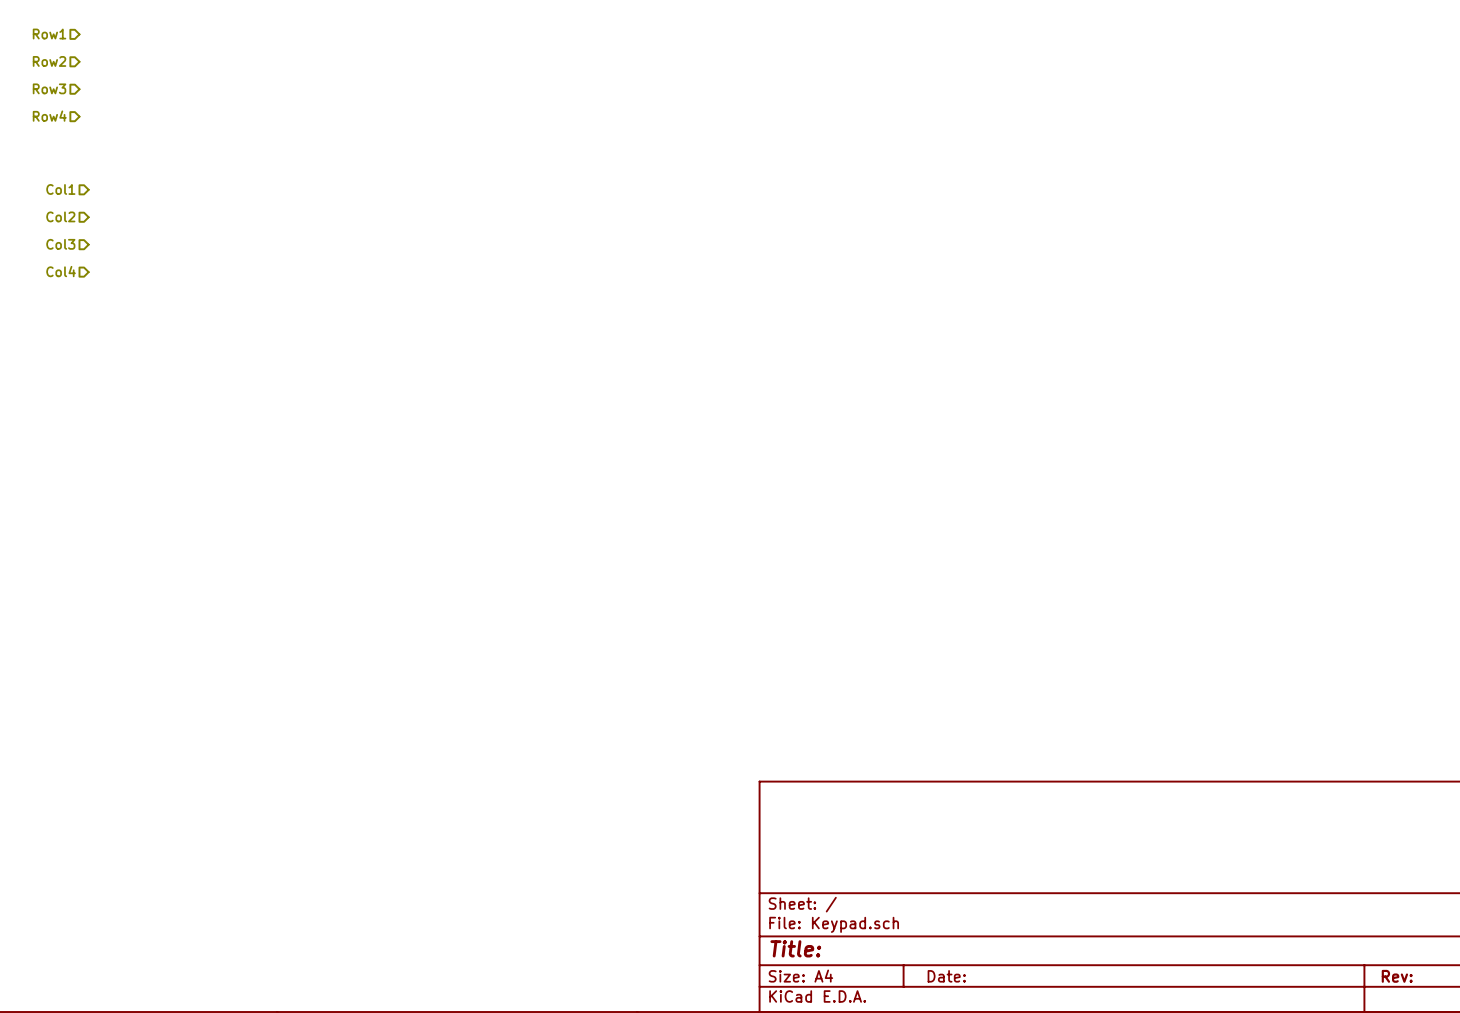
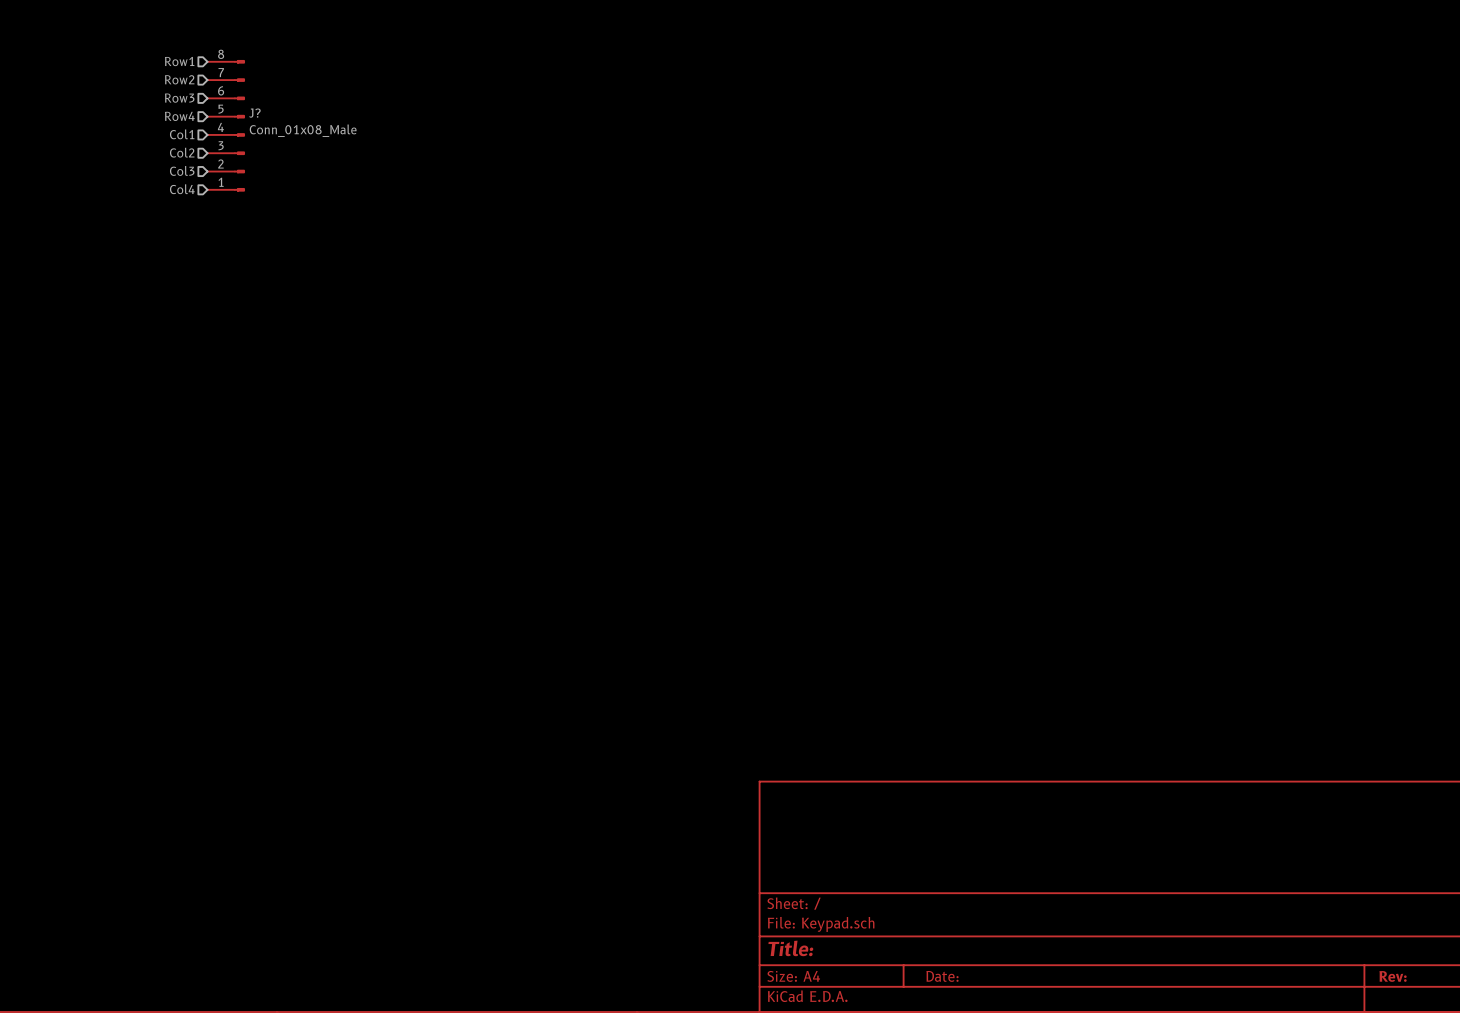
hierarchical label position: Row1 (49, 34) -> Row1 (179, 61)
hierarchical label position: Row2 (49, 61) -> Row2 (179, 79)
hierarchical label position: Row3 (49, 88) -> Row3 (179, 98)
hierarchical label position: Row4 (49, 116) -> Row4 (179, 116)
J?: none -> Conn_01x08_Male (226, 125)
hierarchical label position: Col1 (60, 189) -> Col1 (182, 134)
hierarchical label position: Col2 (60, 216) -> Col2 (182, 152)
hierarchical label position: Col3 (60, 244) -> Col3 (182, 170)
hierarchical label position: Col4 (61, 271) -> Col4 (182, 189)

